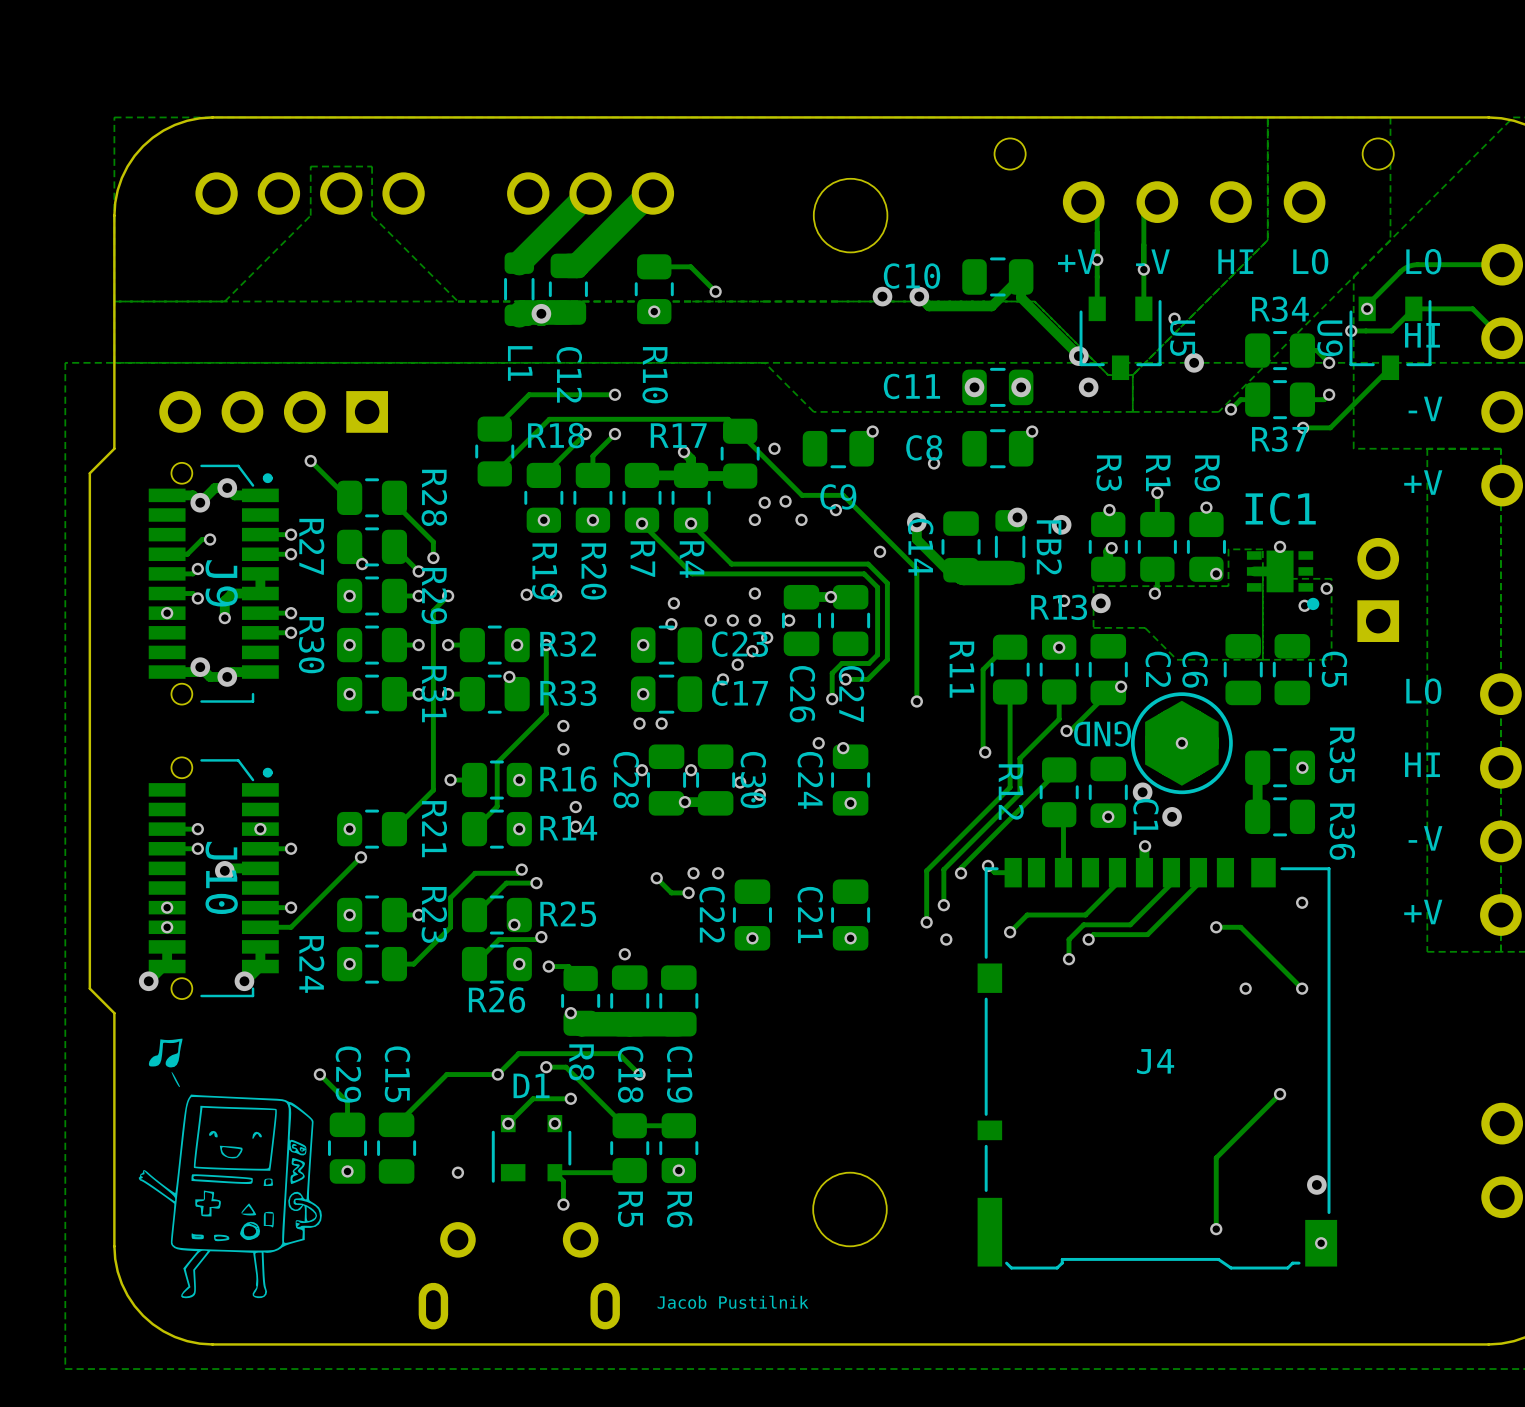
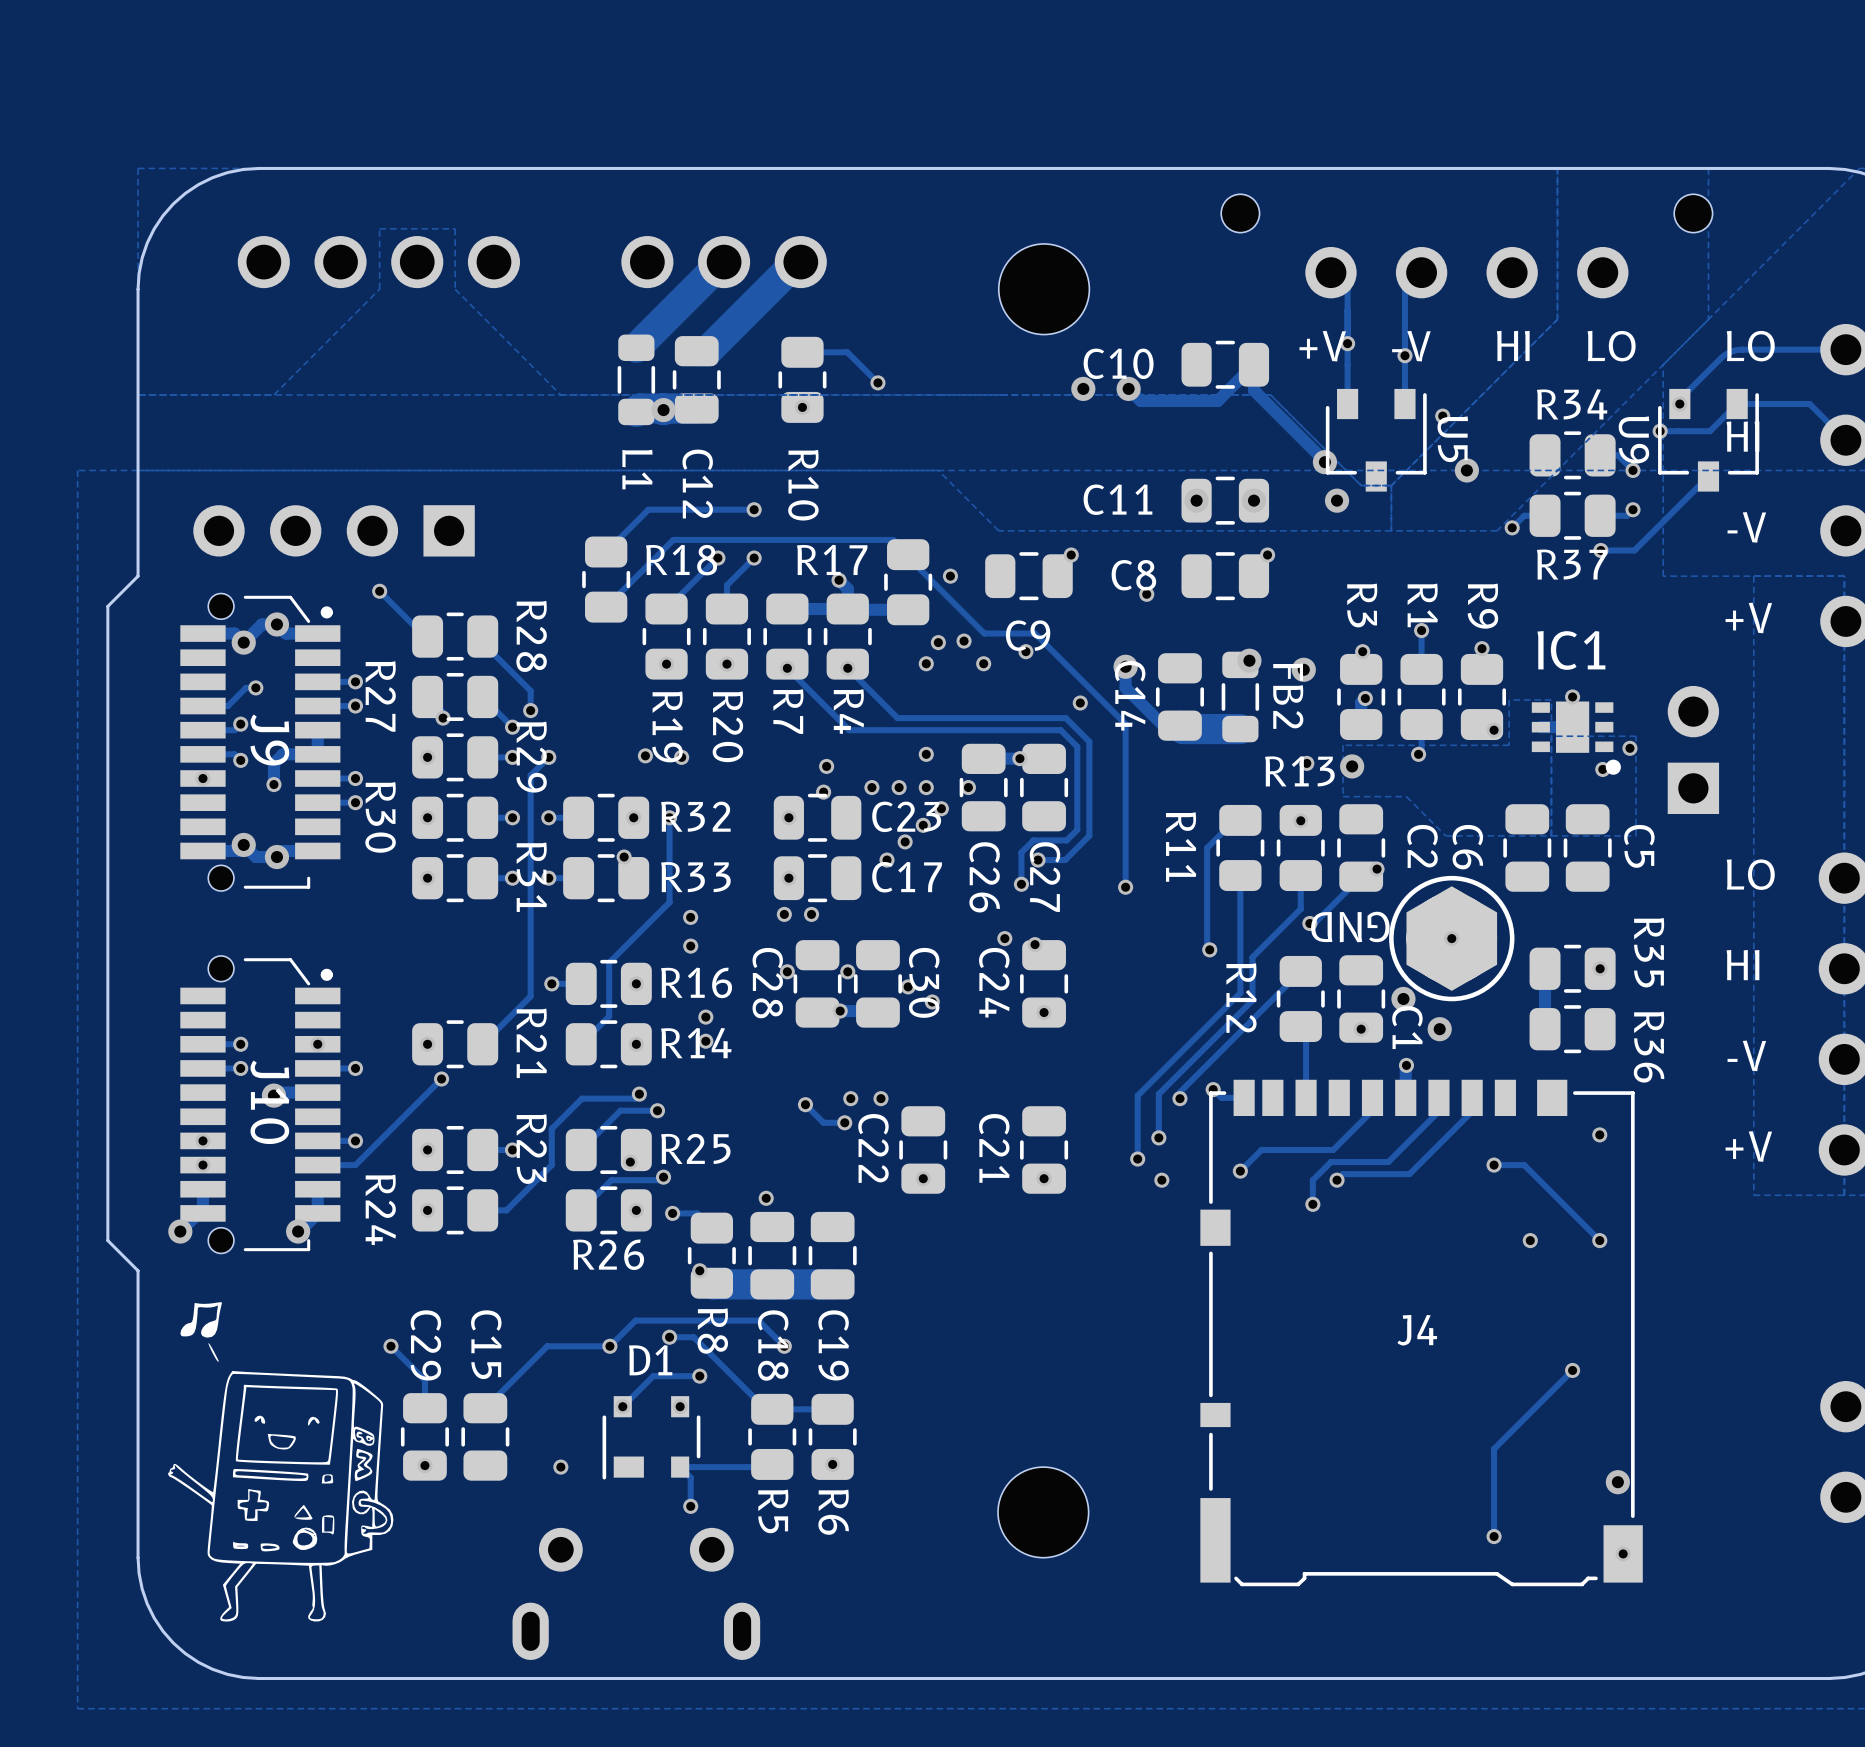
text: Jacob Pustilnik (733, 1302) -> none

